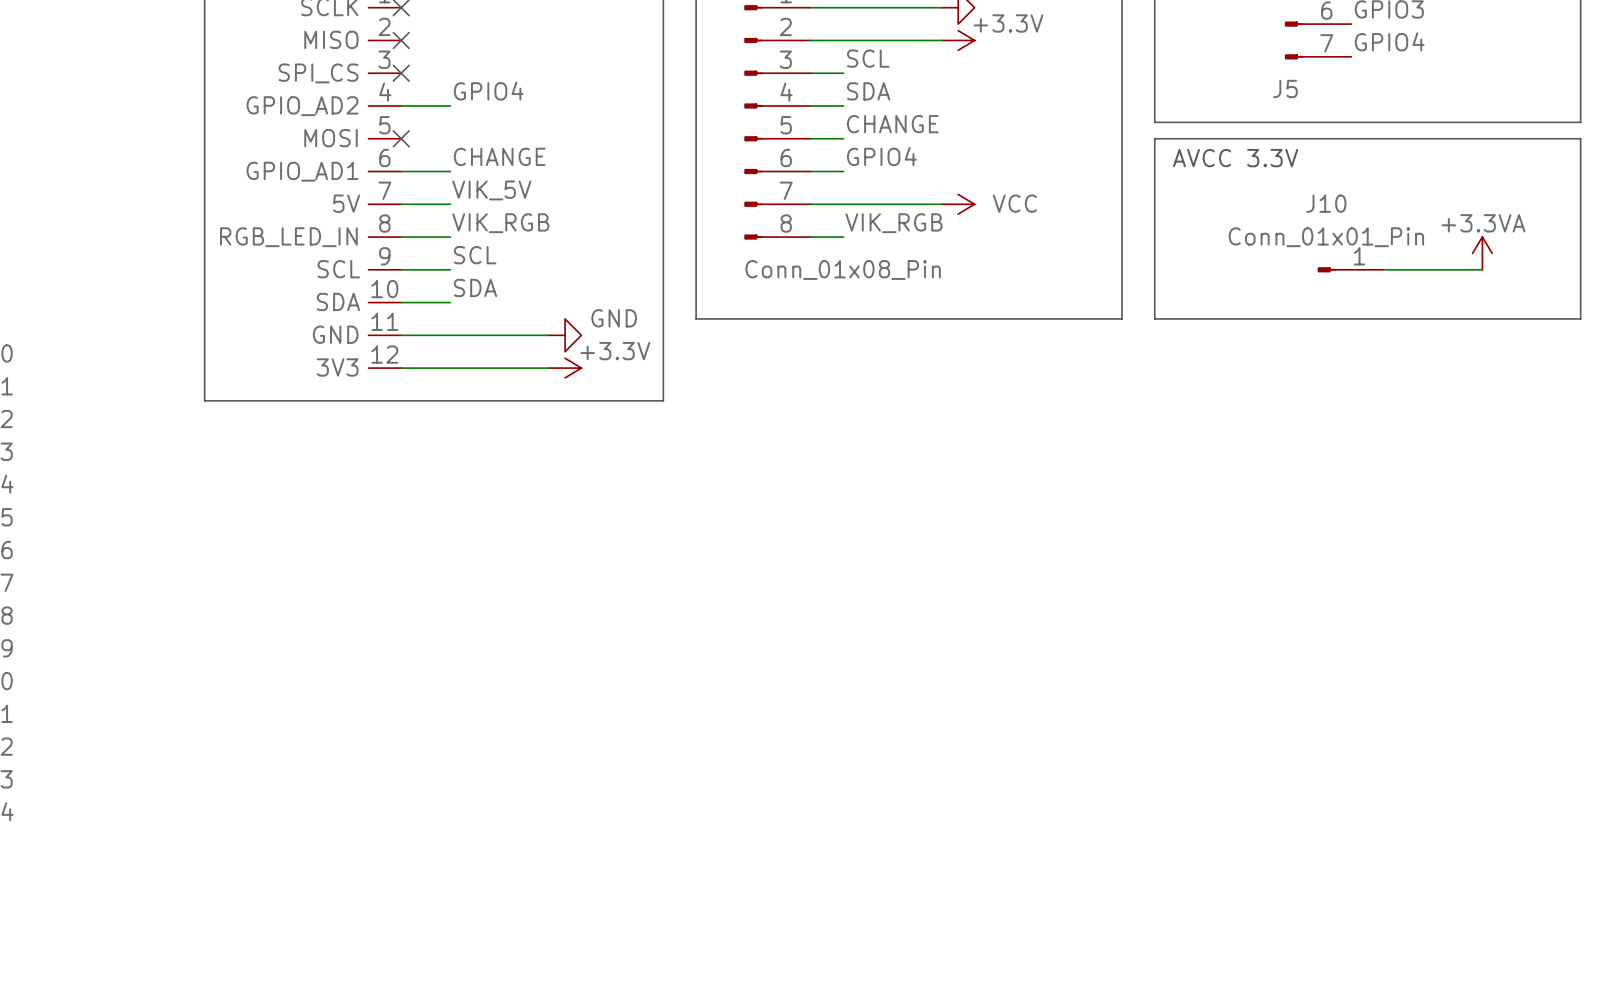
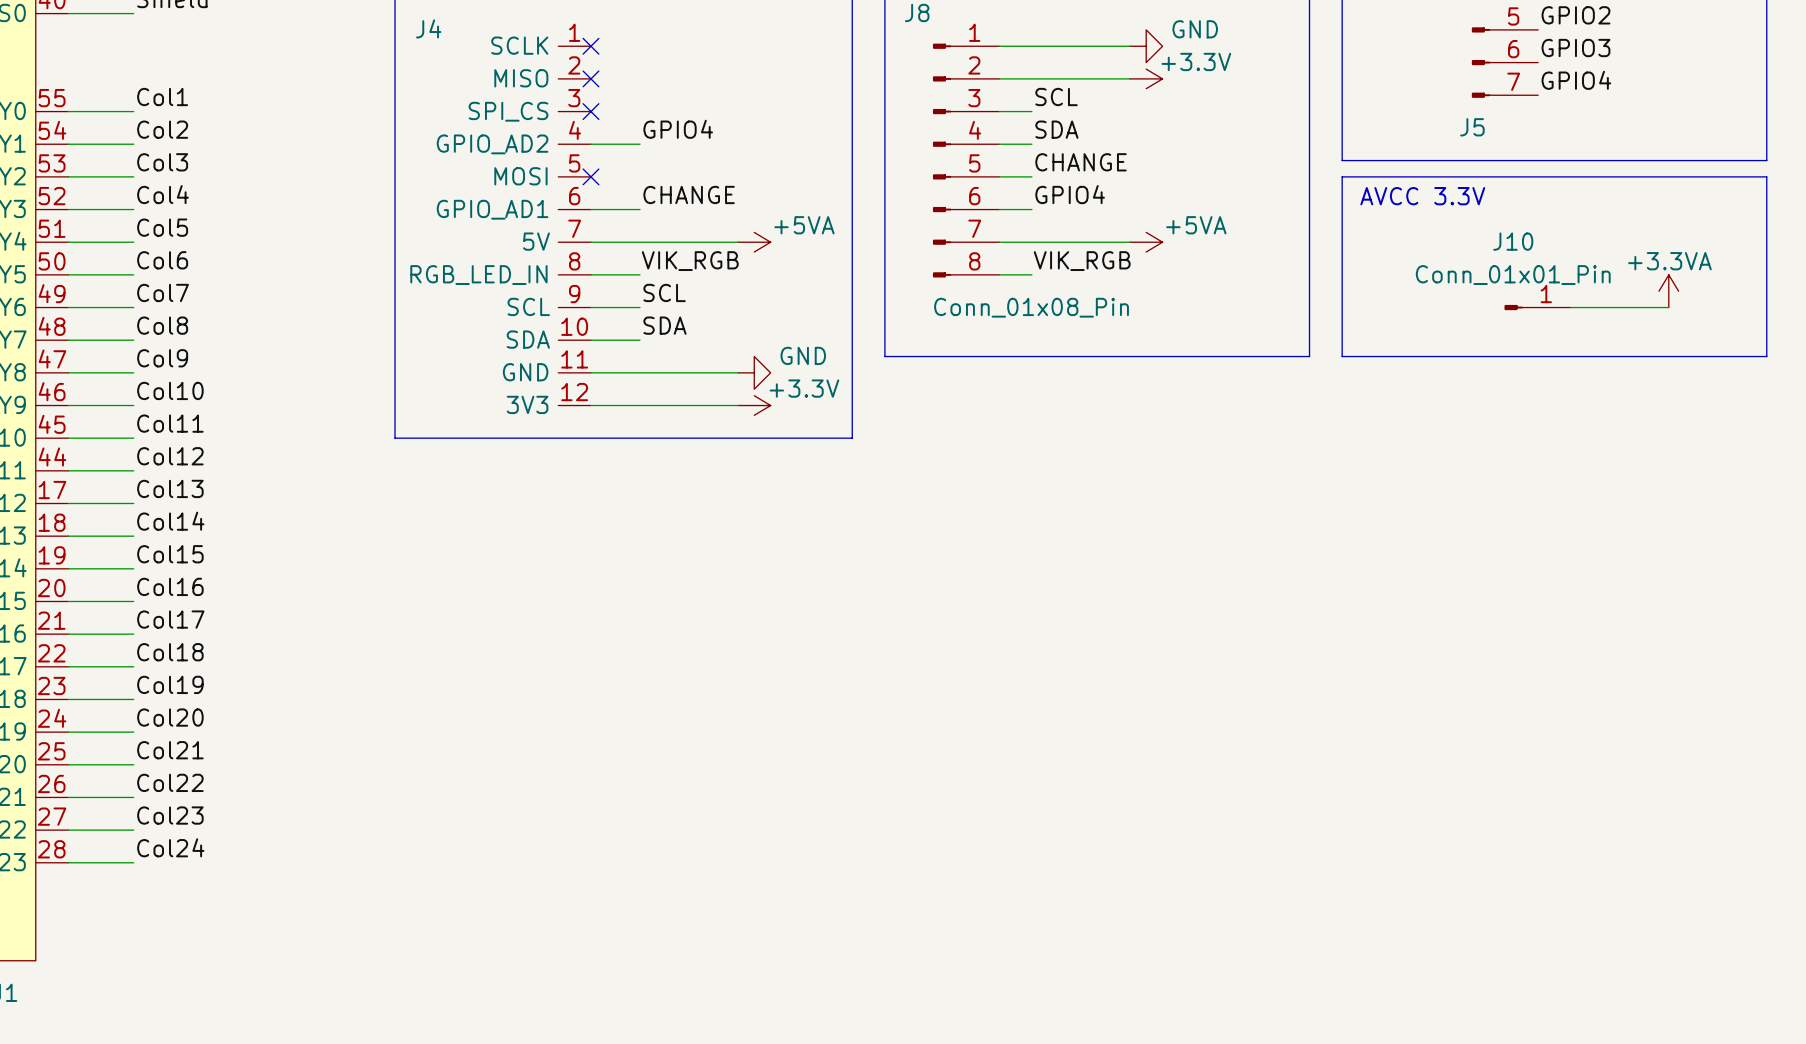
label: VIK_5V (491, 190) -> none
wire: none -> (639, 242) (737, 242)
power symbol: none -> +5VA (754, 242)
power symbol: VCC (958, 204) -> +5VA (1146, 242)

